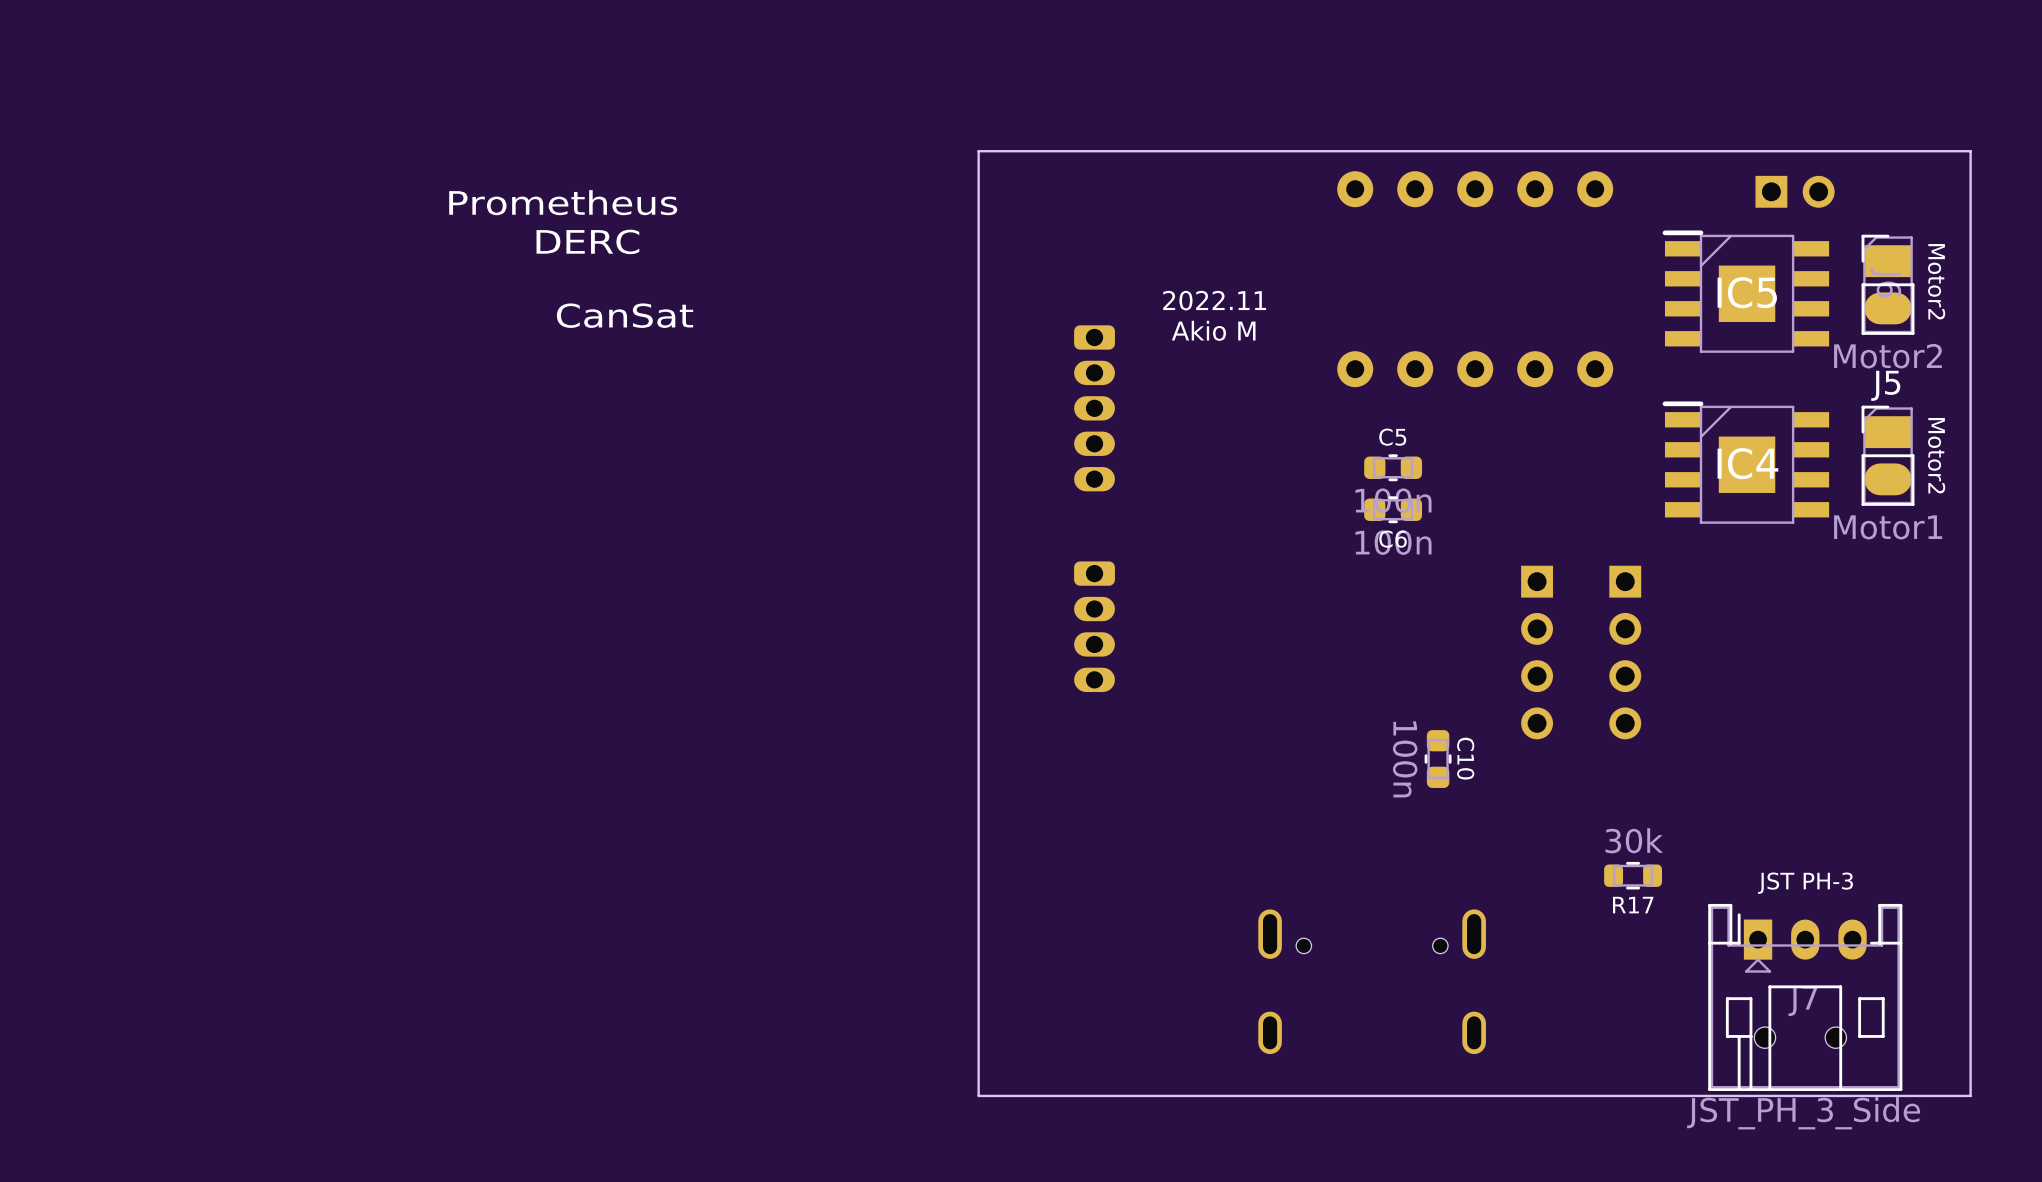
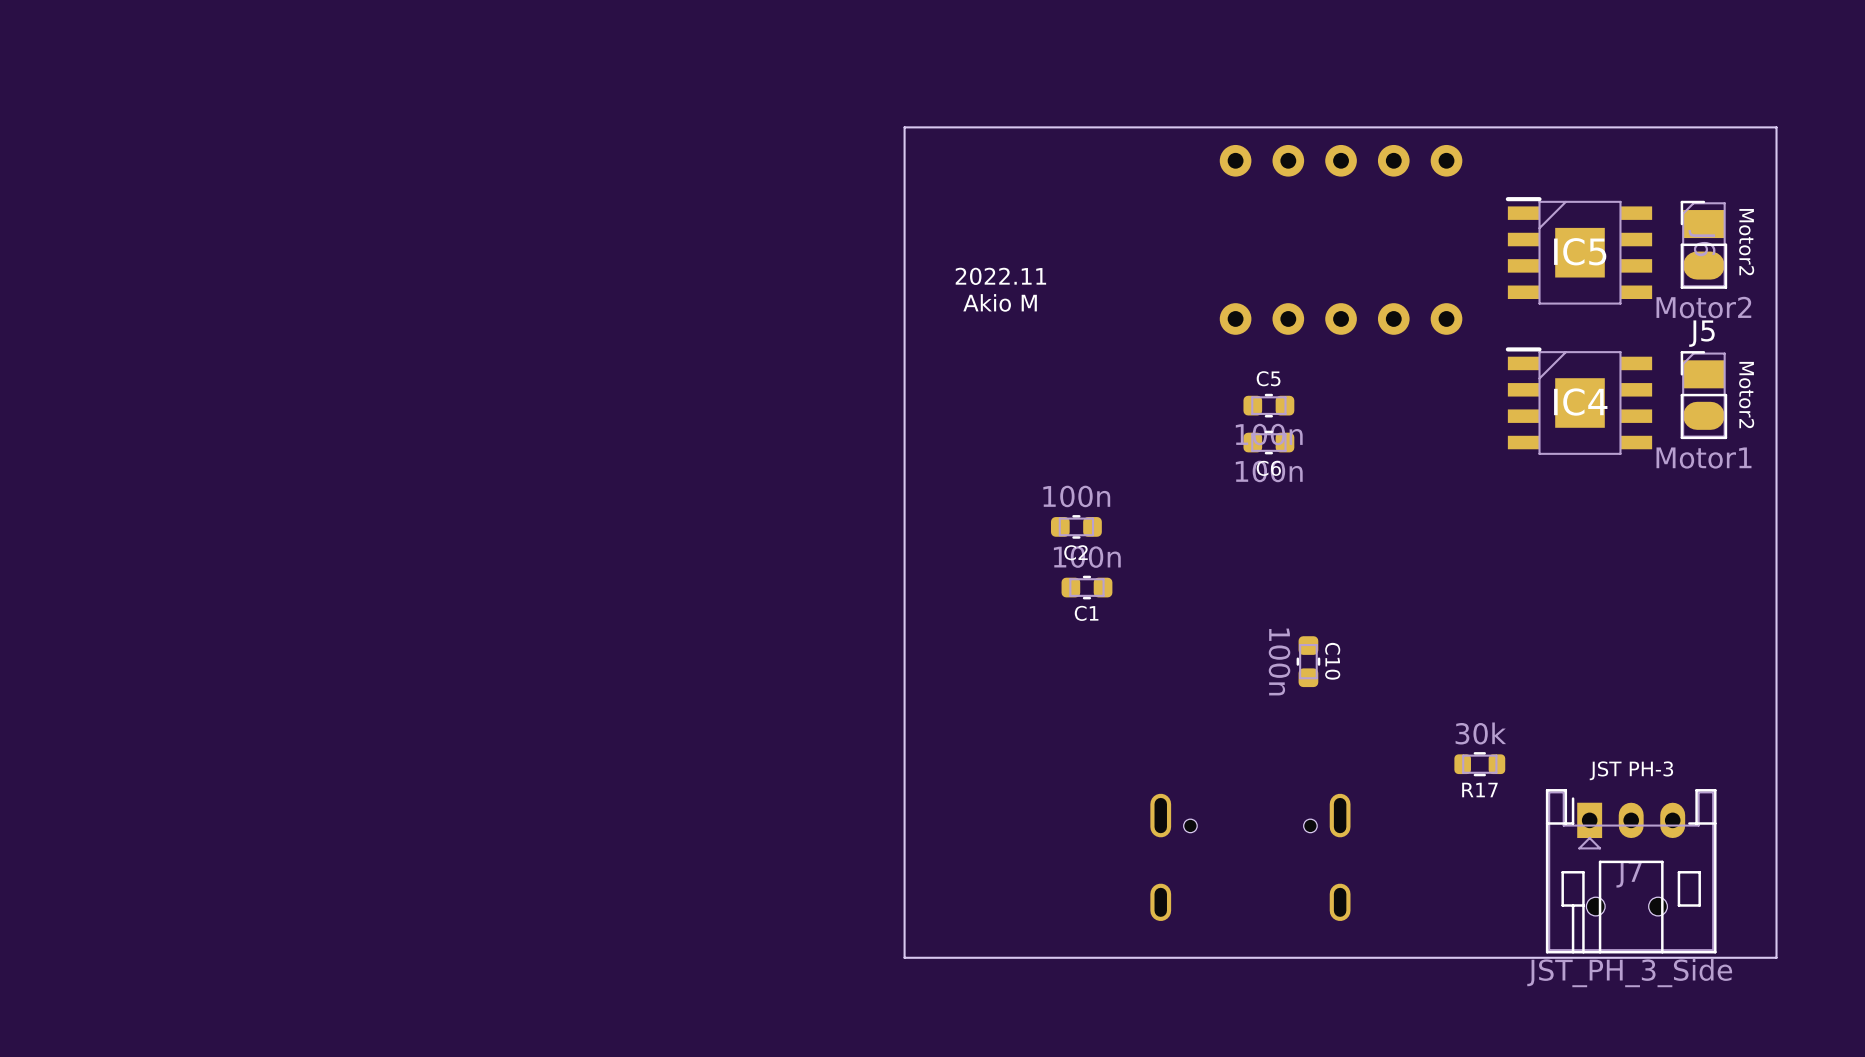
part: (1795, 191) -> none
text: Prometheus (563, 202) -> none
text: DERC (587, 241) -> none
text position: 2022.11 (1214, 300) -> 2022.11 (1000, 276)
text: CanSat (625, 315) -> none
text position: Akio M (1213, 330) -> Akio M (1000, 302)
part: (1094, 408) -> none
C2: none -> 100n (1076, 526)
part: (1094, 626) -> none
part: (1537, 652) -> none
part: (1625, 652) -> none
C1: none -> 100n (1086, 587)

